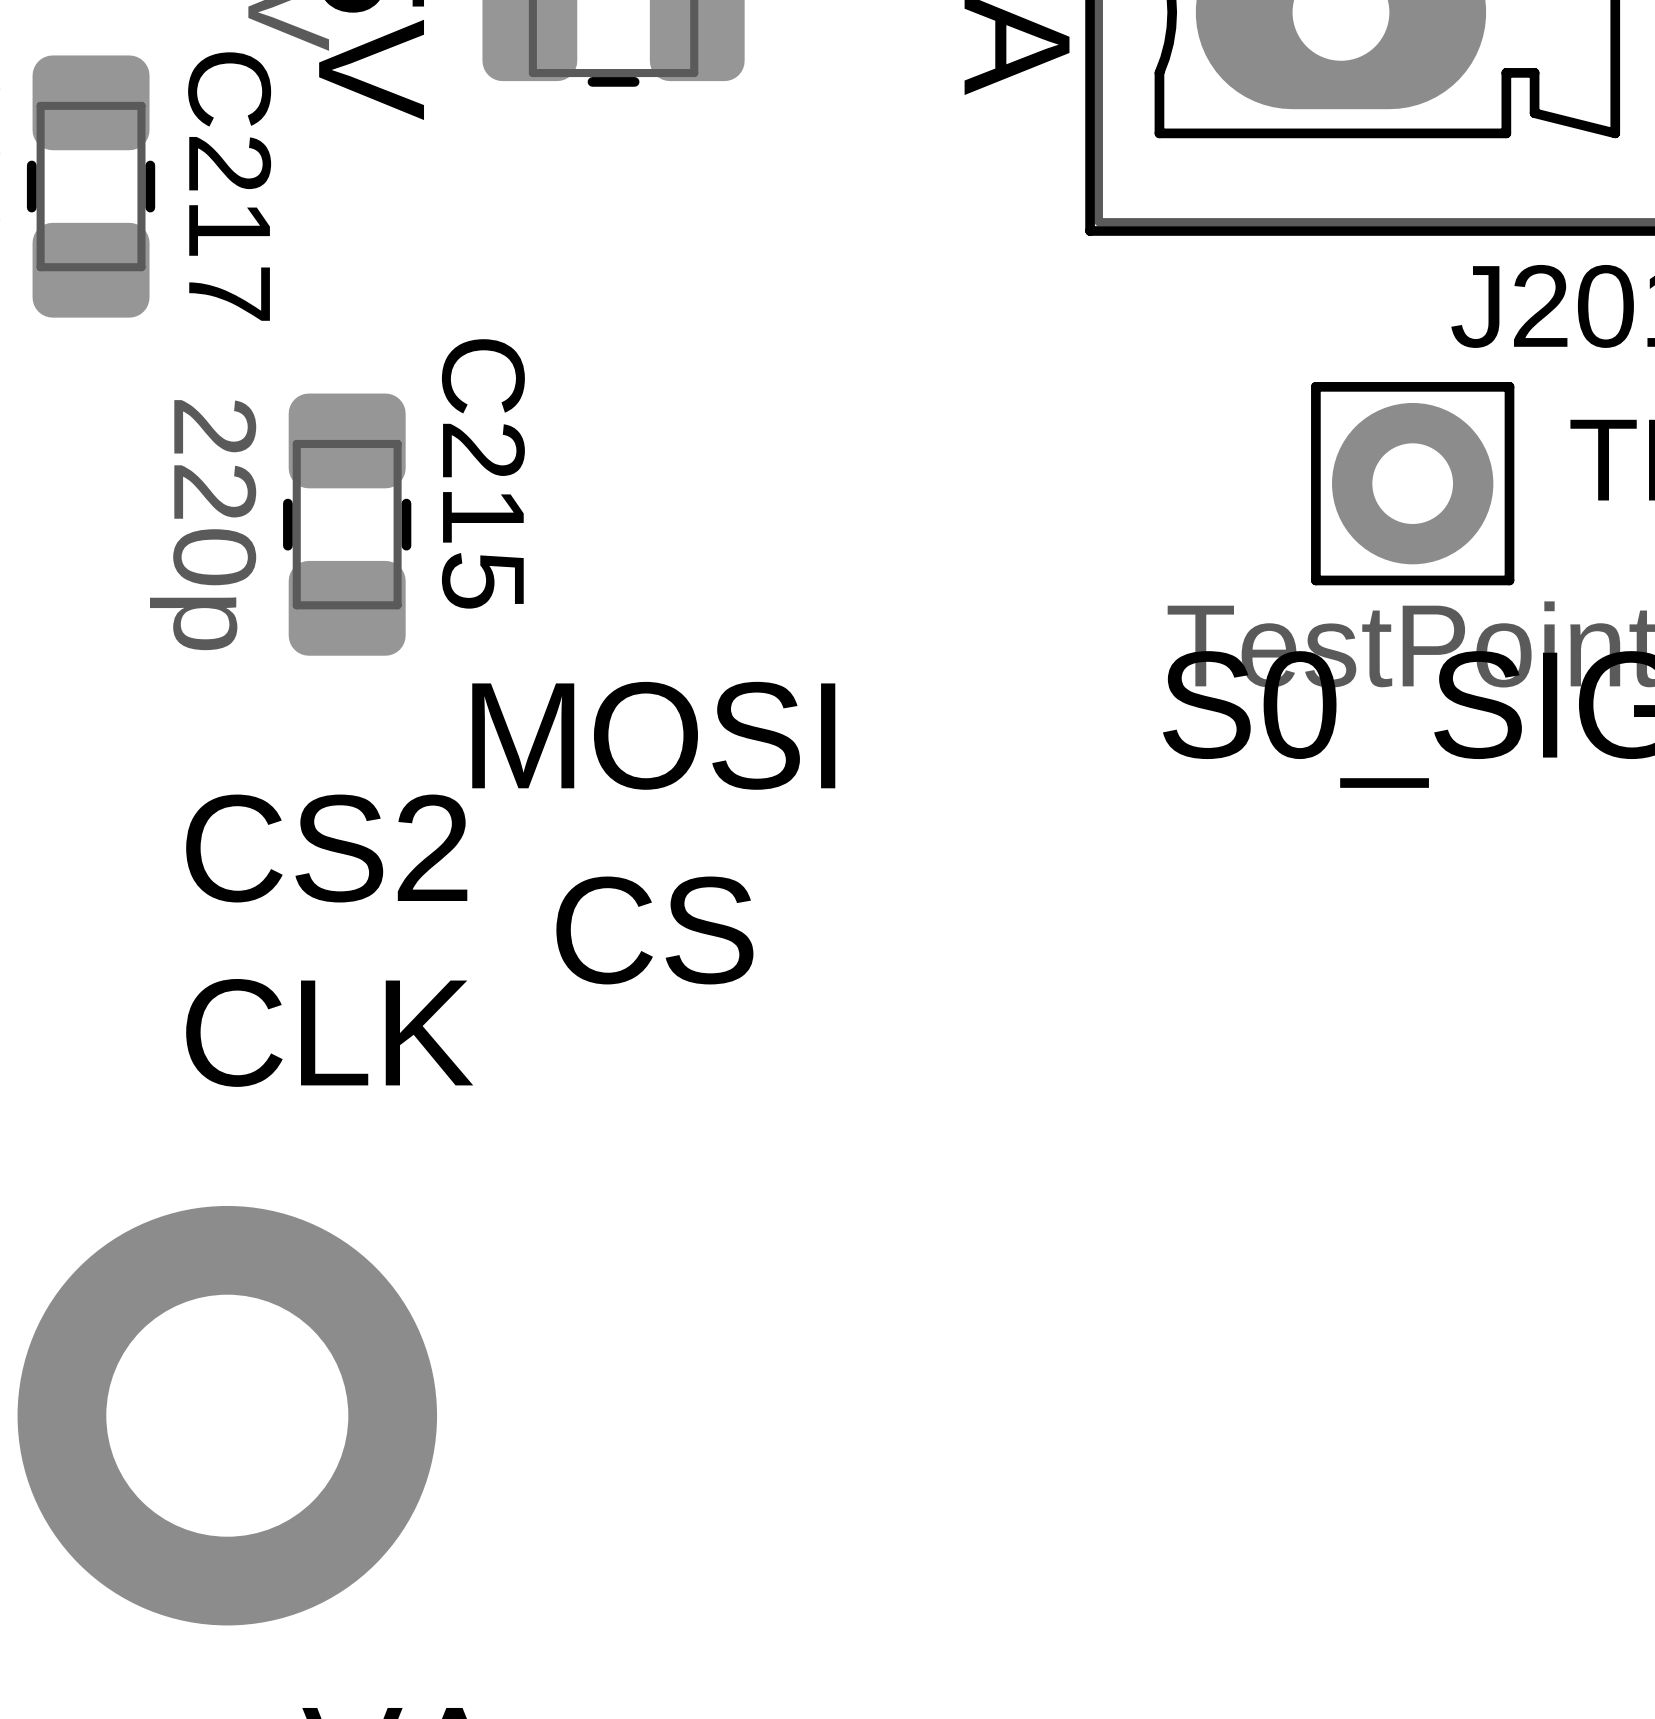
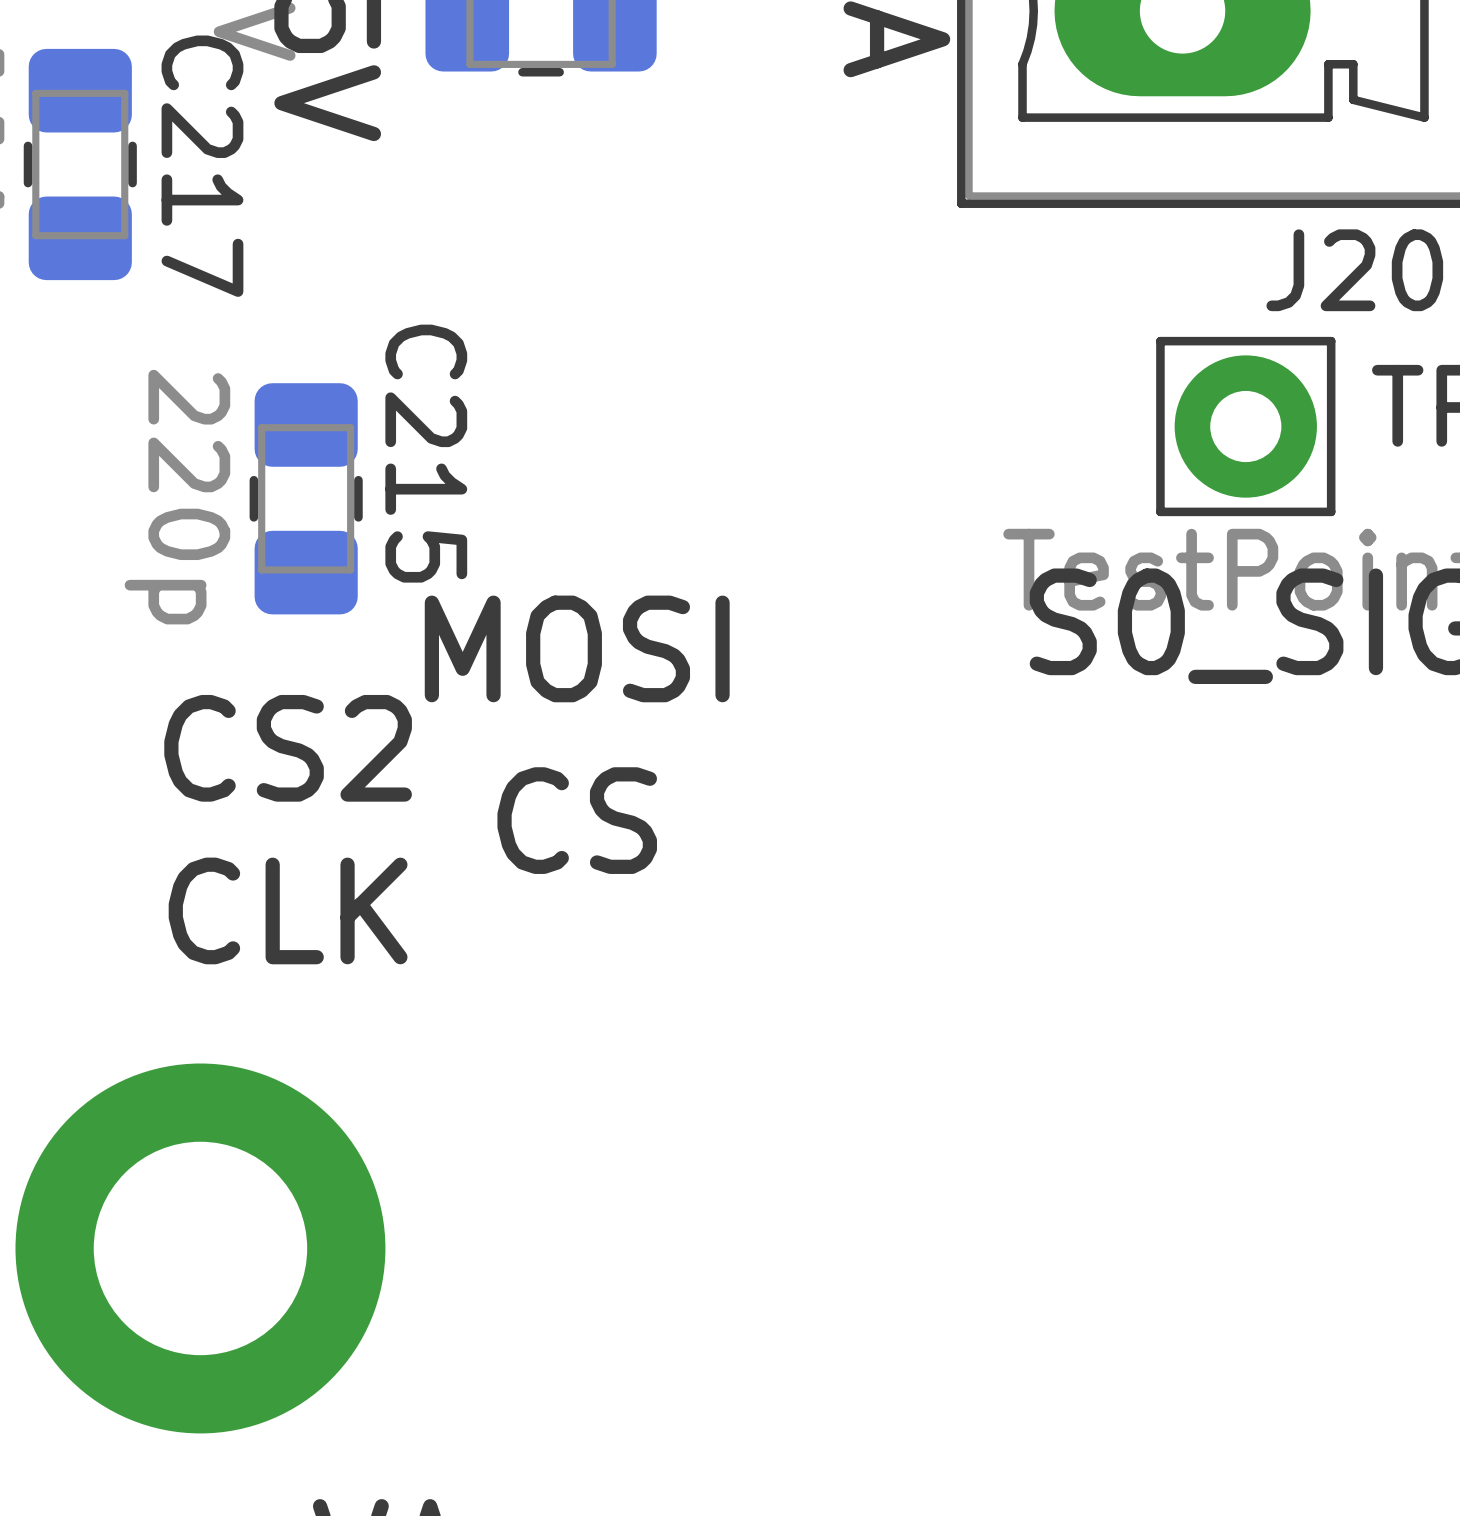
C215 position: (347, 524) -> (306, 498)

